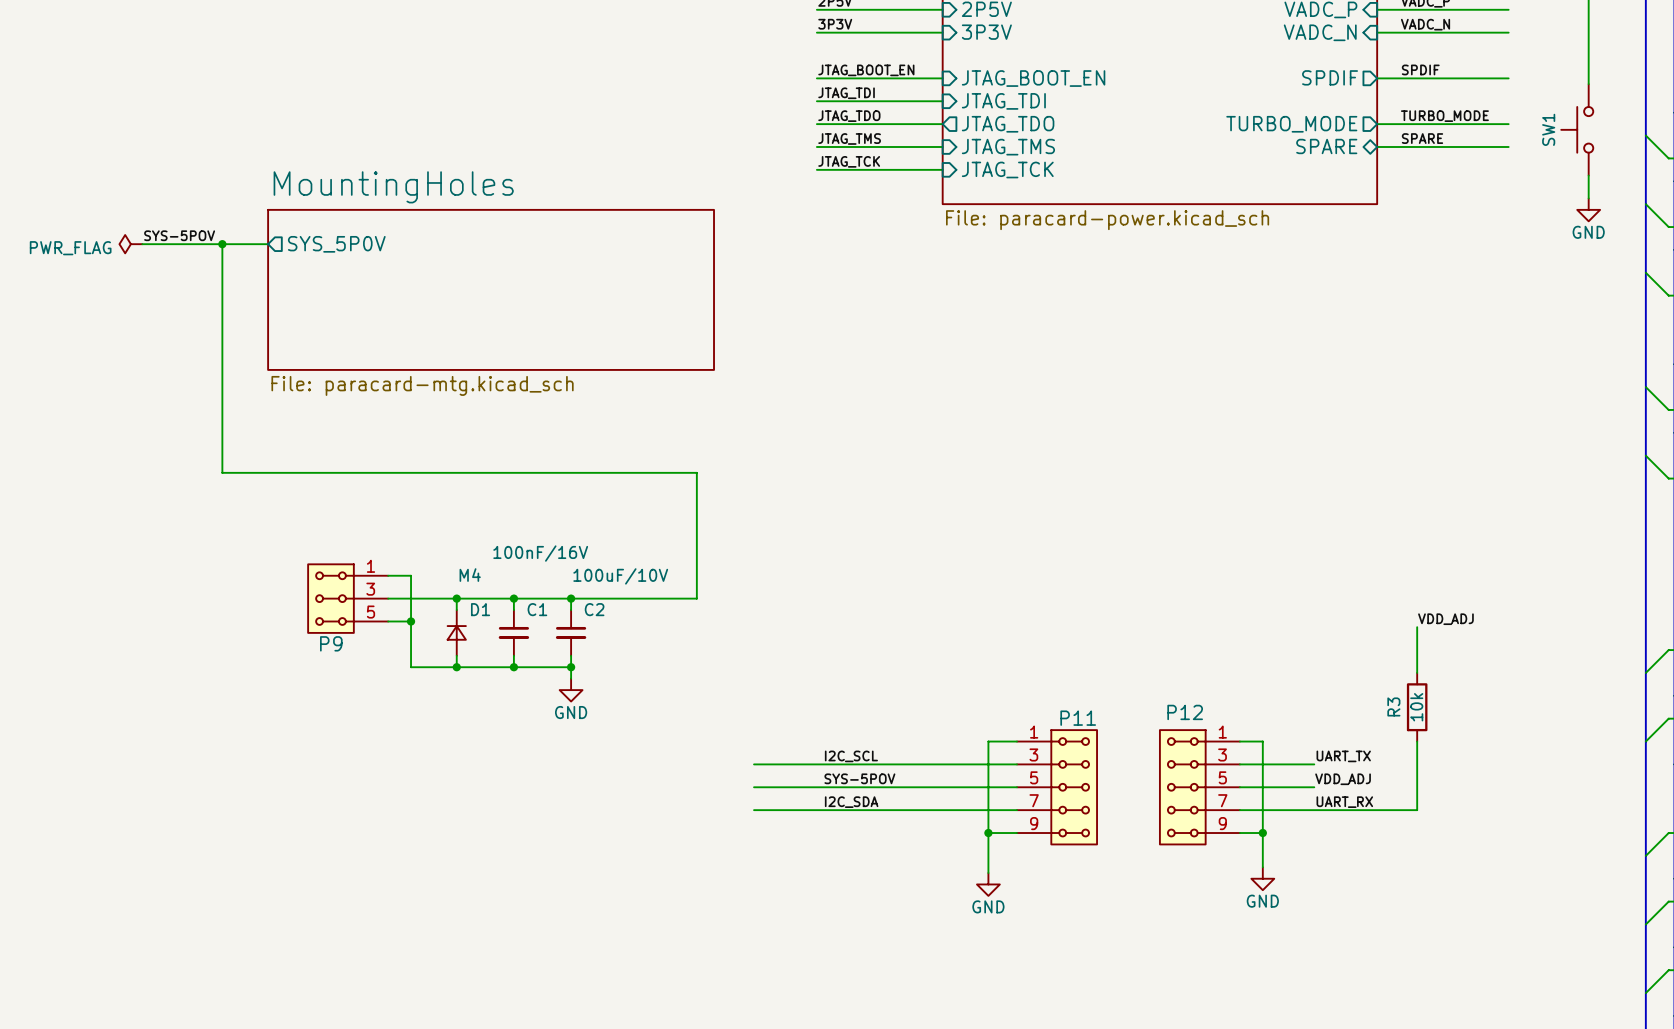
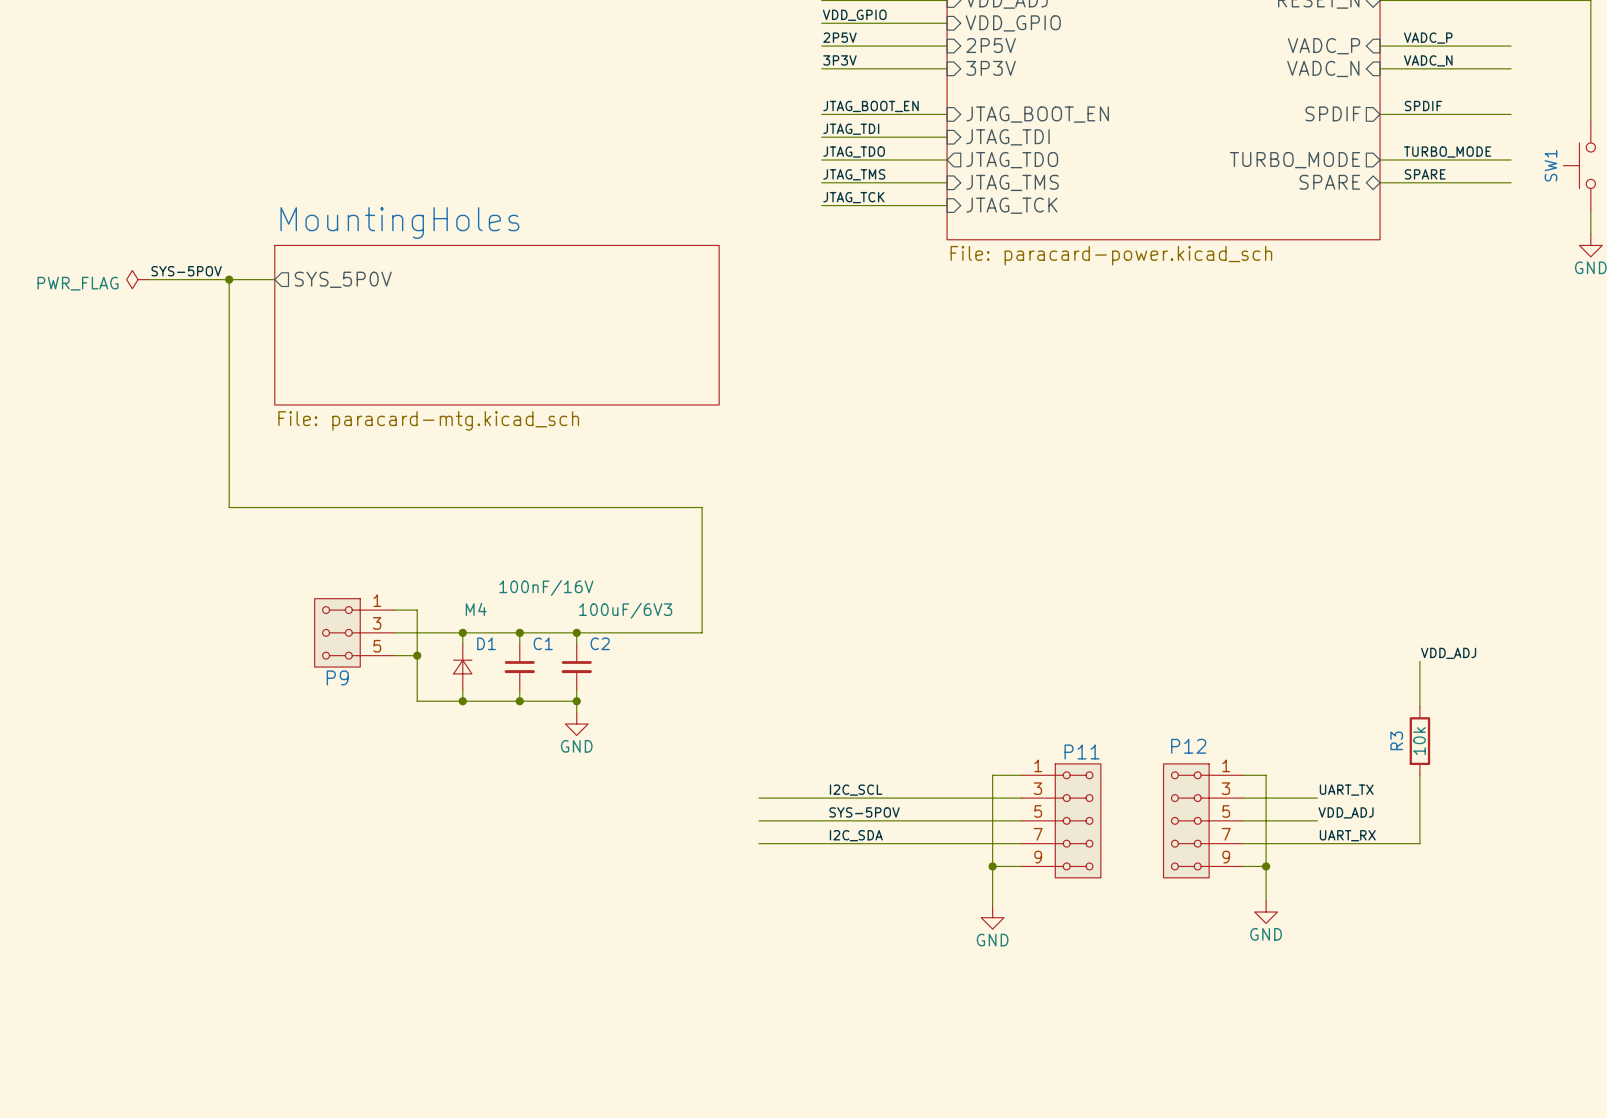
C2 value: 100uF/10V (620, 576) -> 100uF/6V3 (625, 610)

